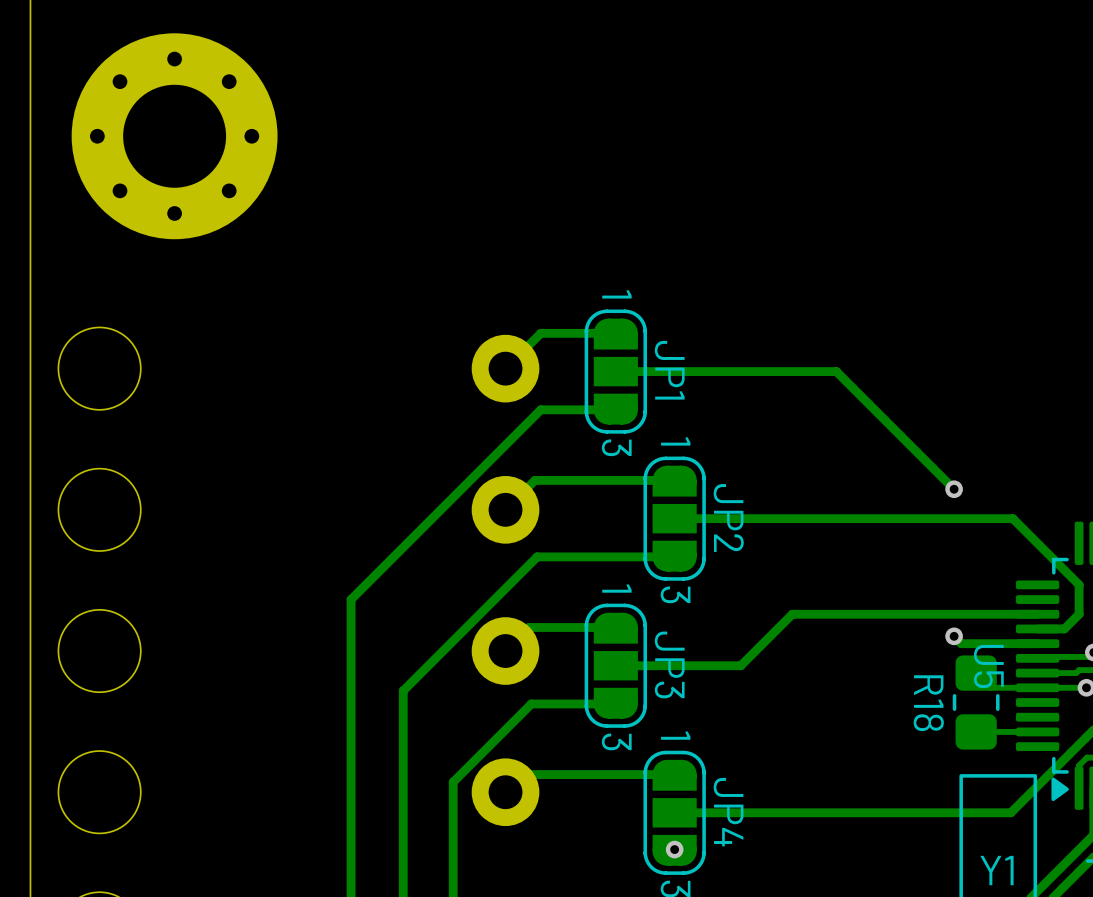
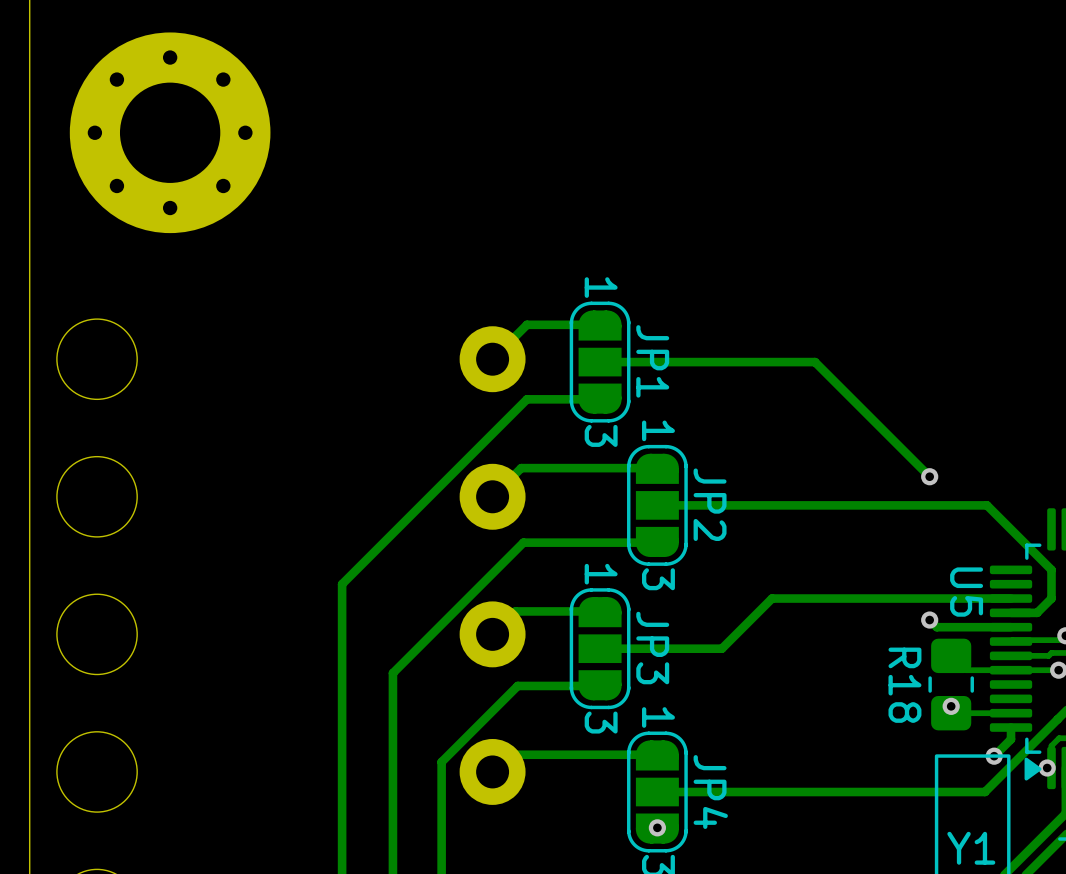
U5 name position: U5 (988, 666) -> U5 (966, 592)
via: none -> (951, 706)
track: none -> (1011, 727) (1011, 739) (994, 756)
via: none -> (994, 756)
via: none -> (1047, 768)

